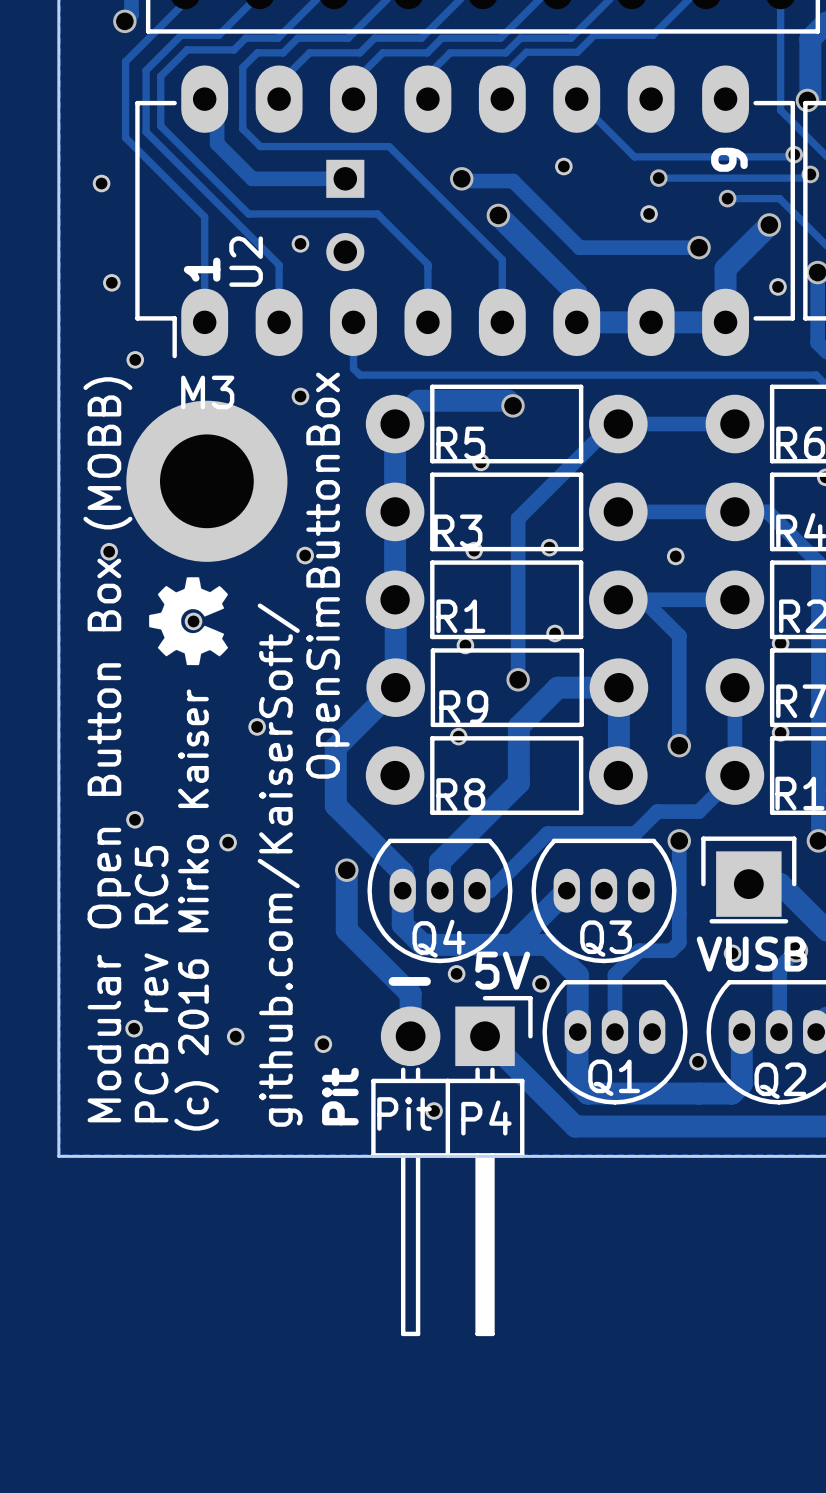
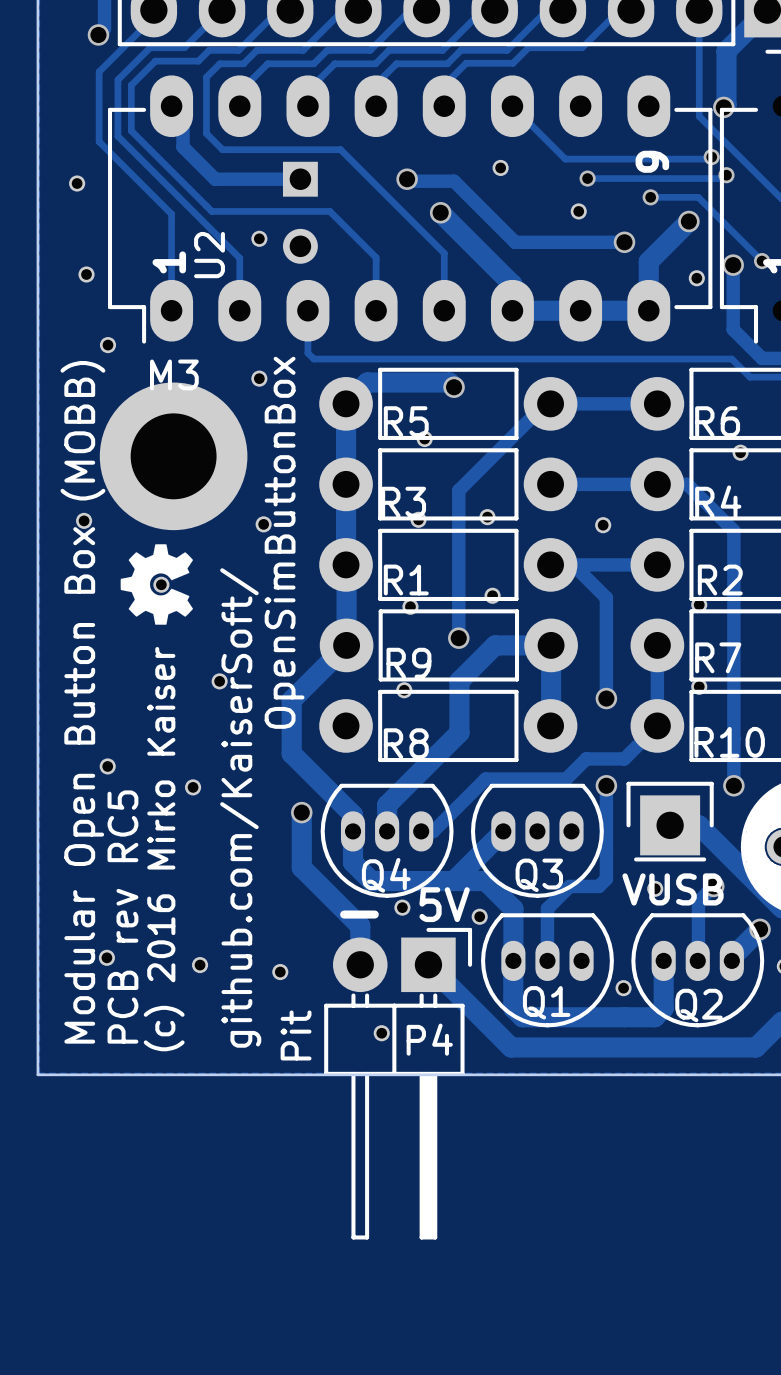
text: Pit (340, 1096) -> none
P4 value rotation: 0° (404, 1113) -> 90° counterclockwise (296, 1035)

